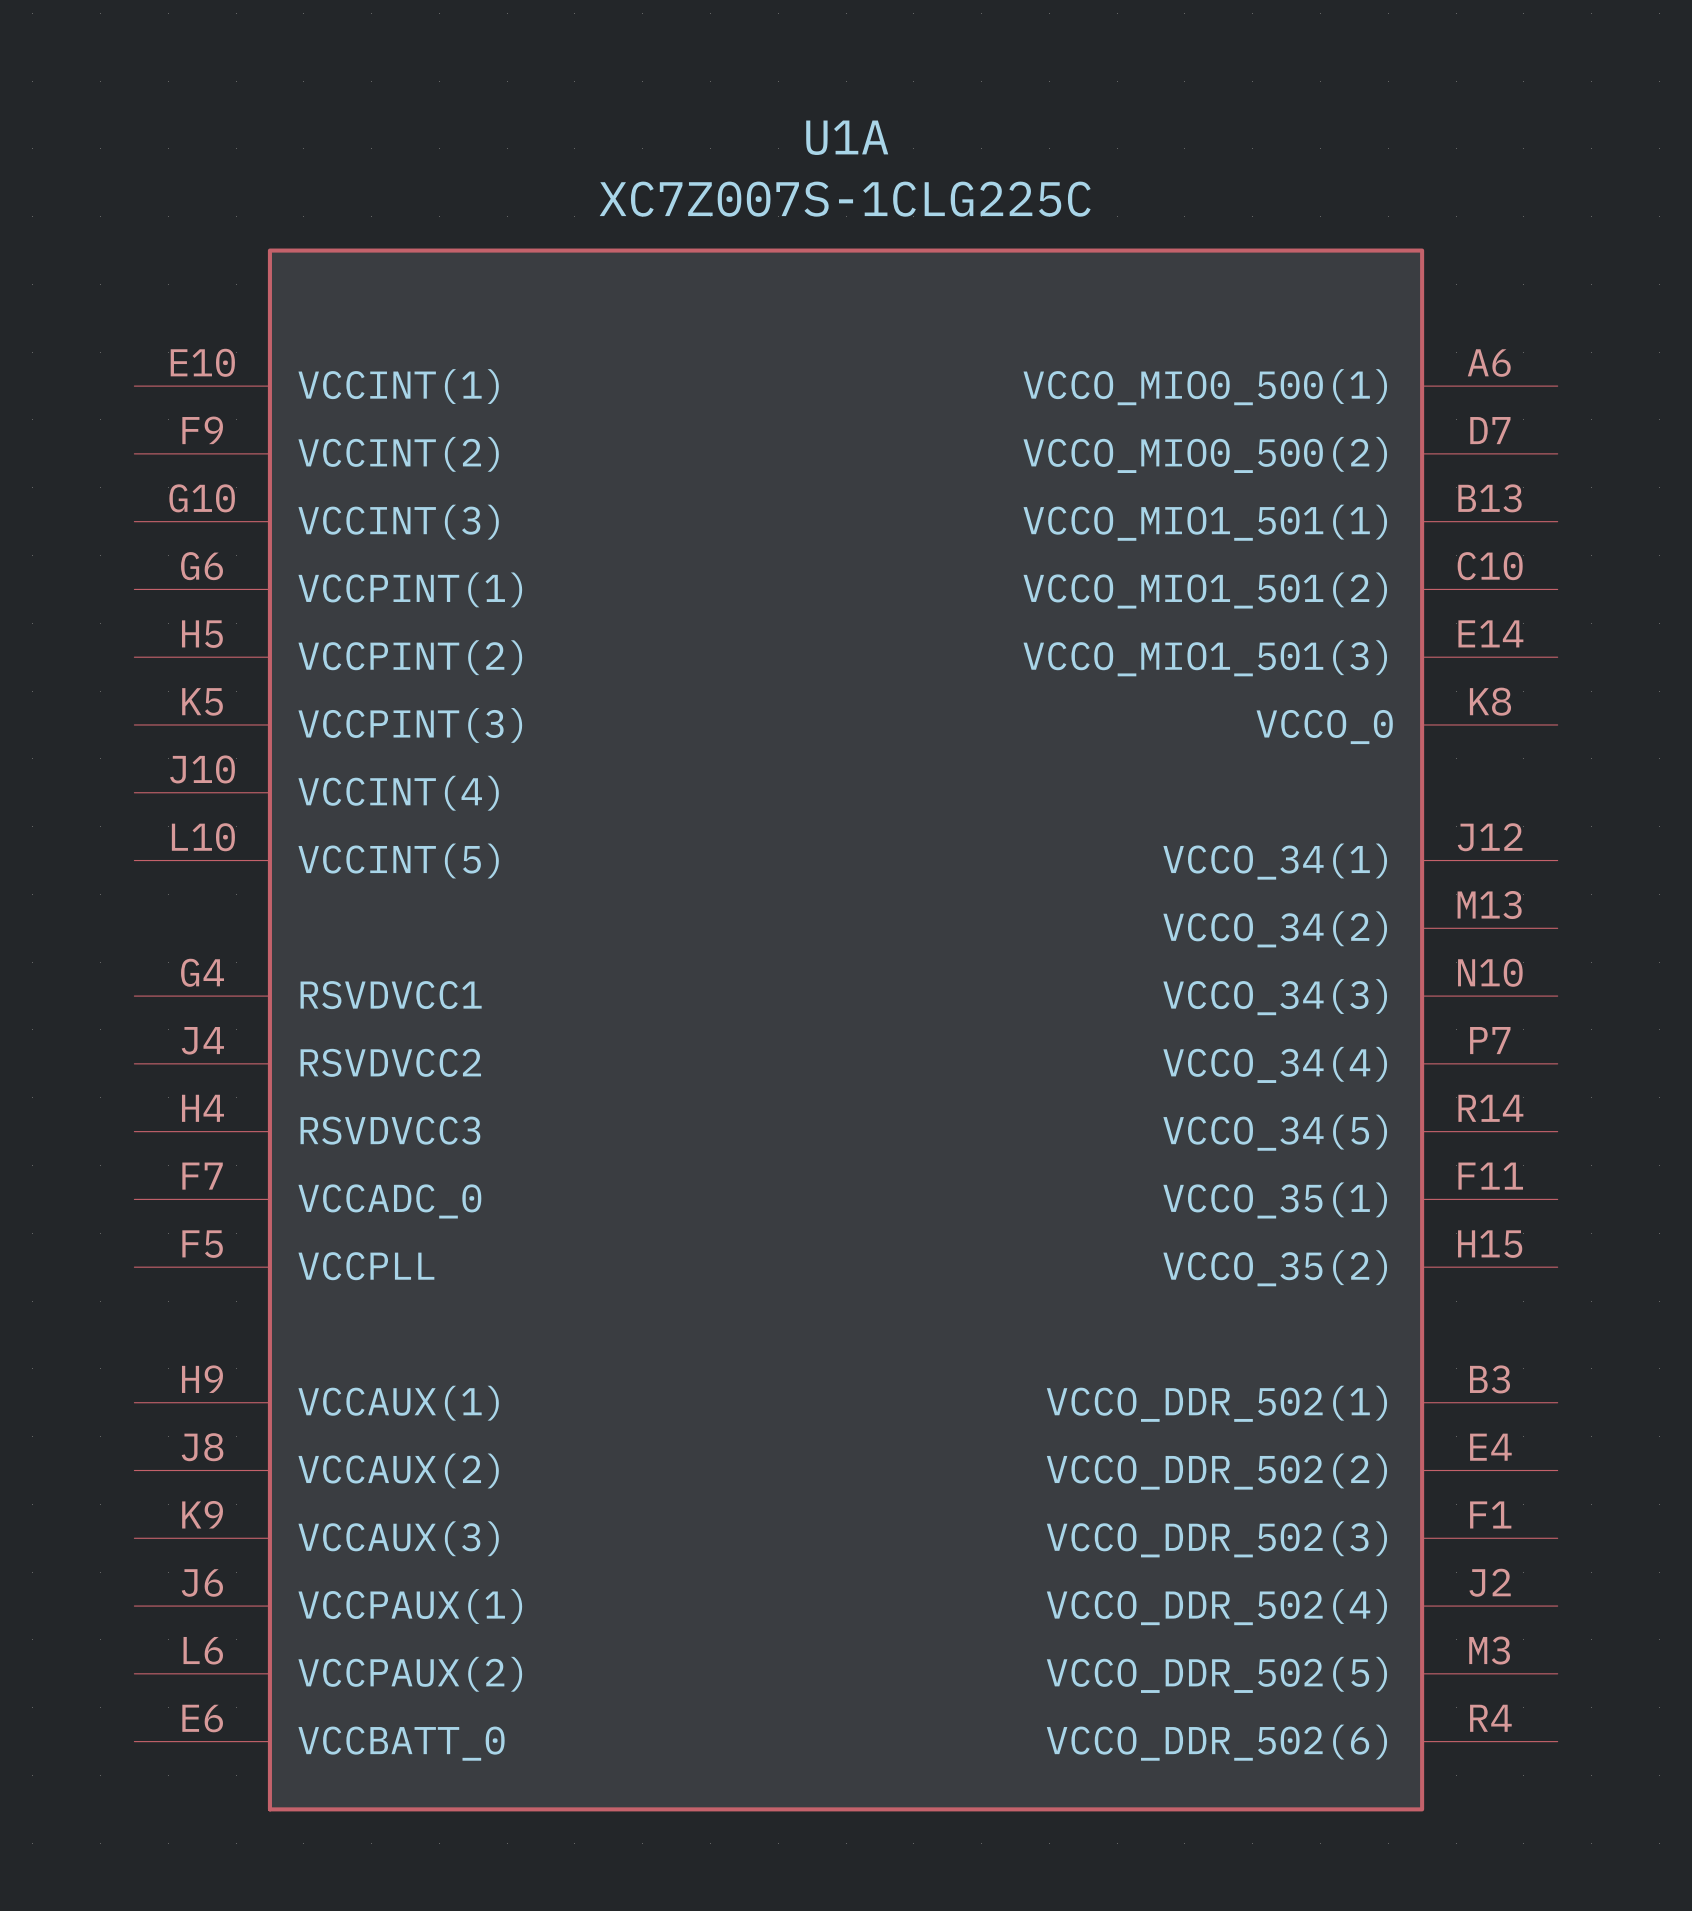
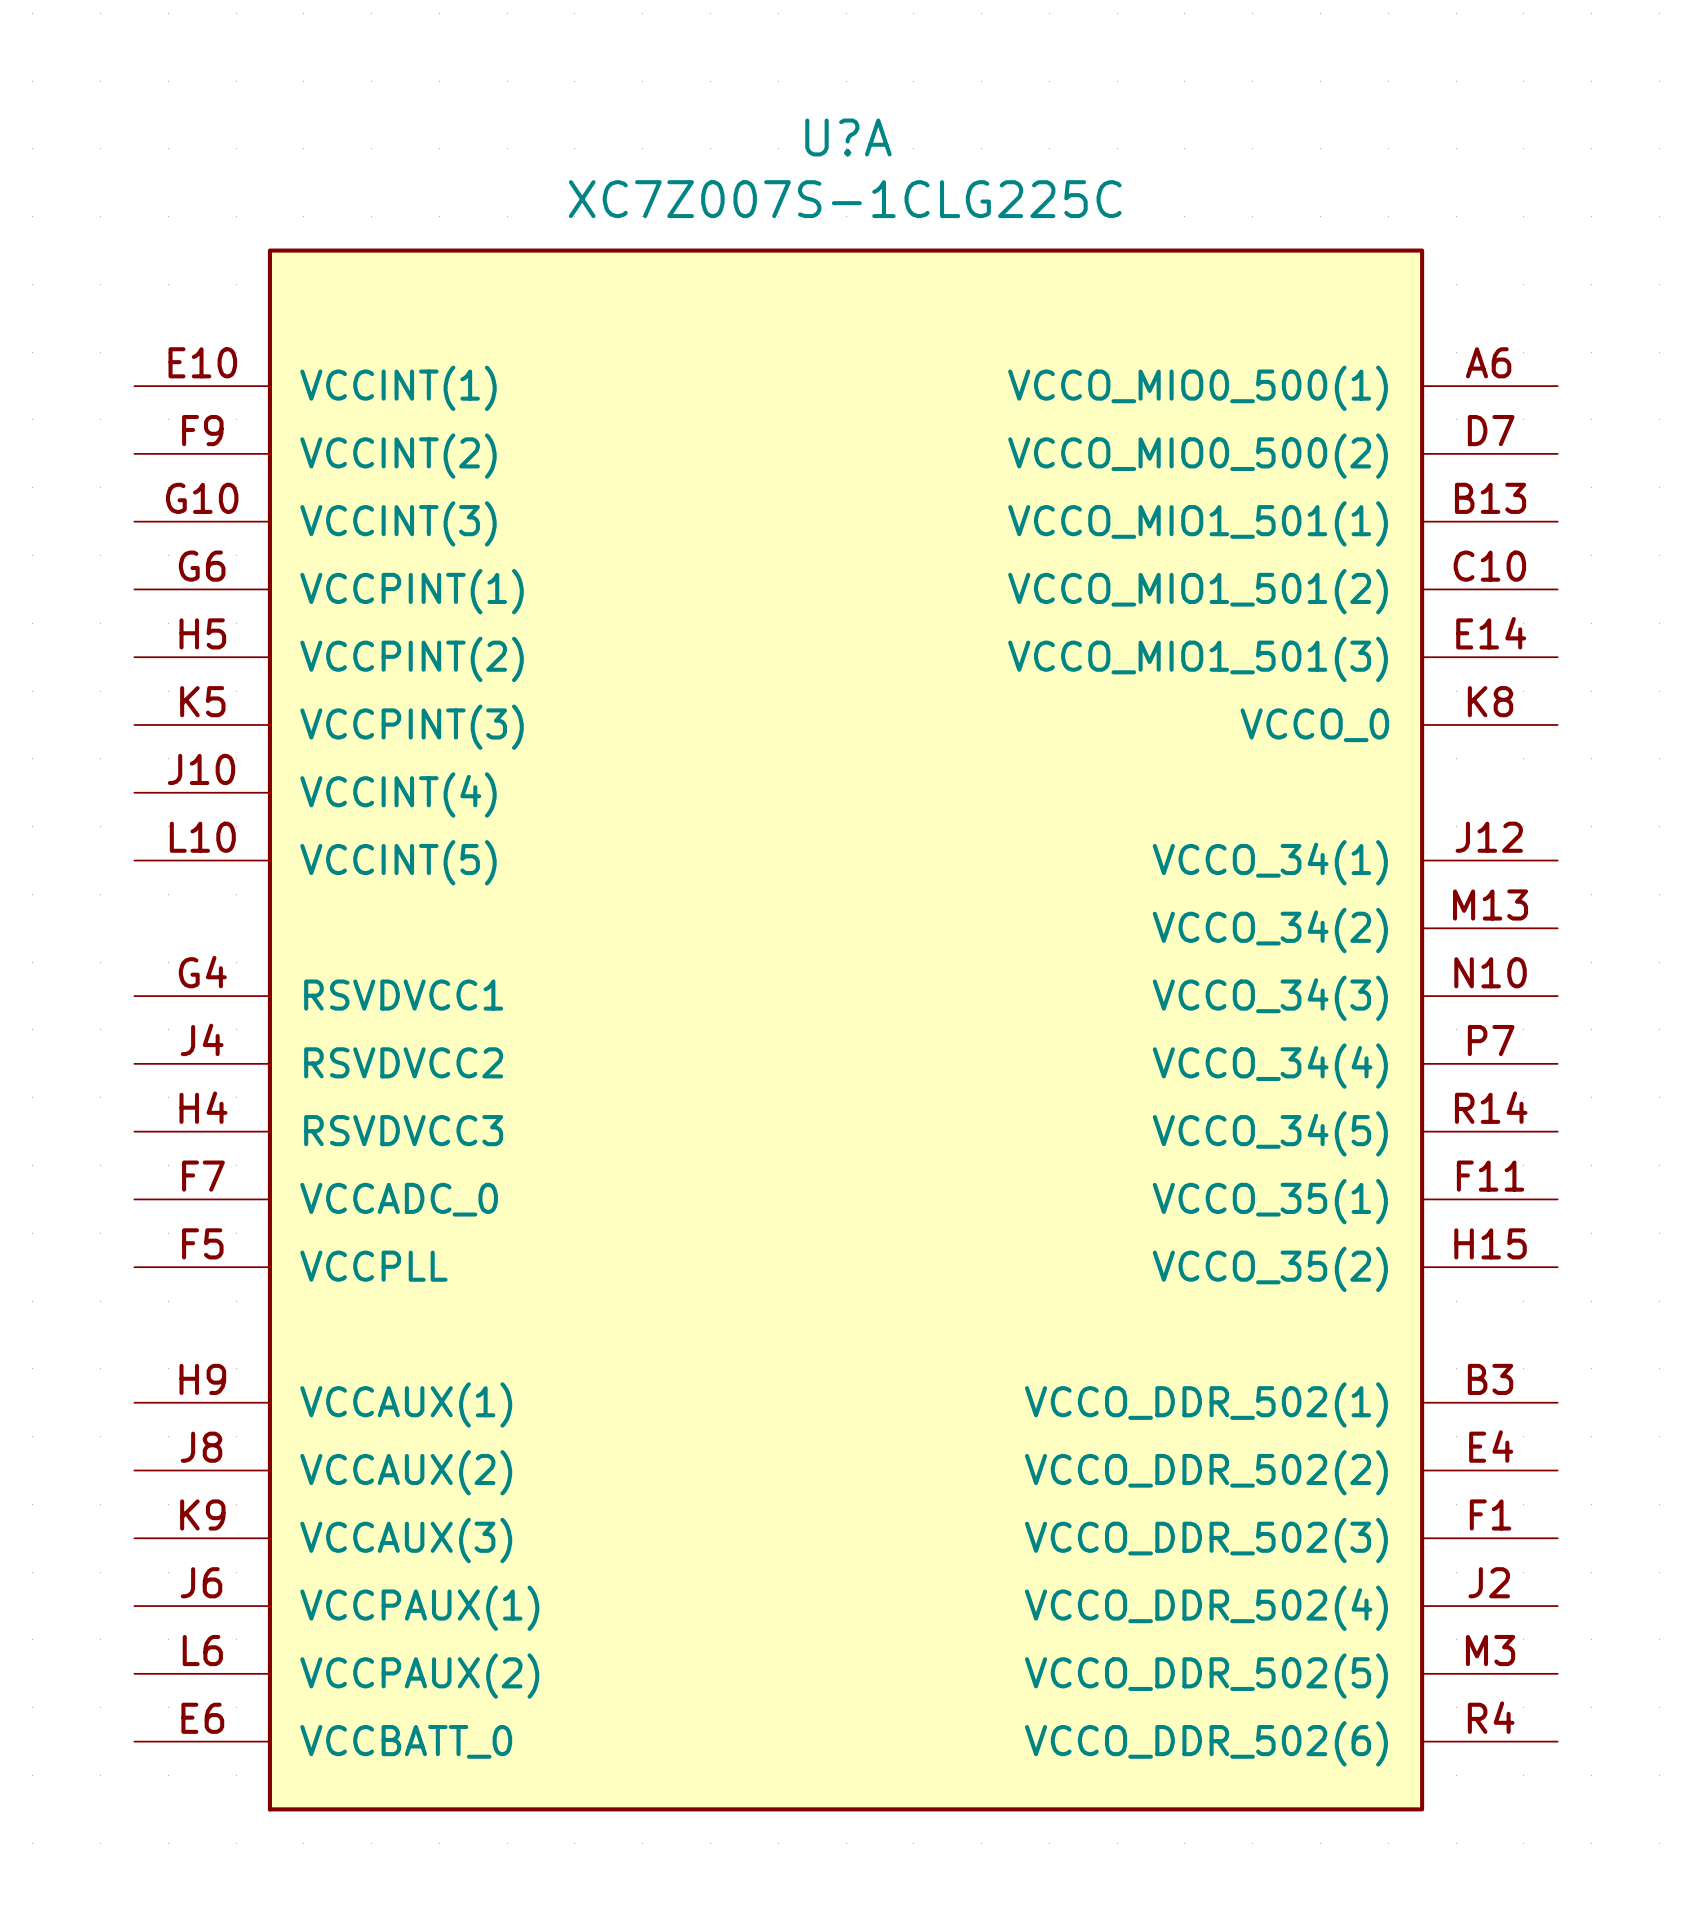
U1A name: U1A (847, 137) -> U?A (848, 137)

